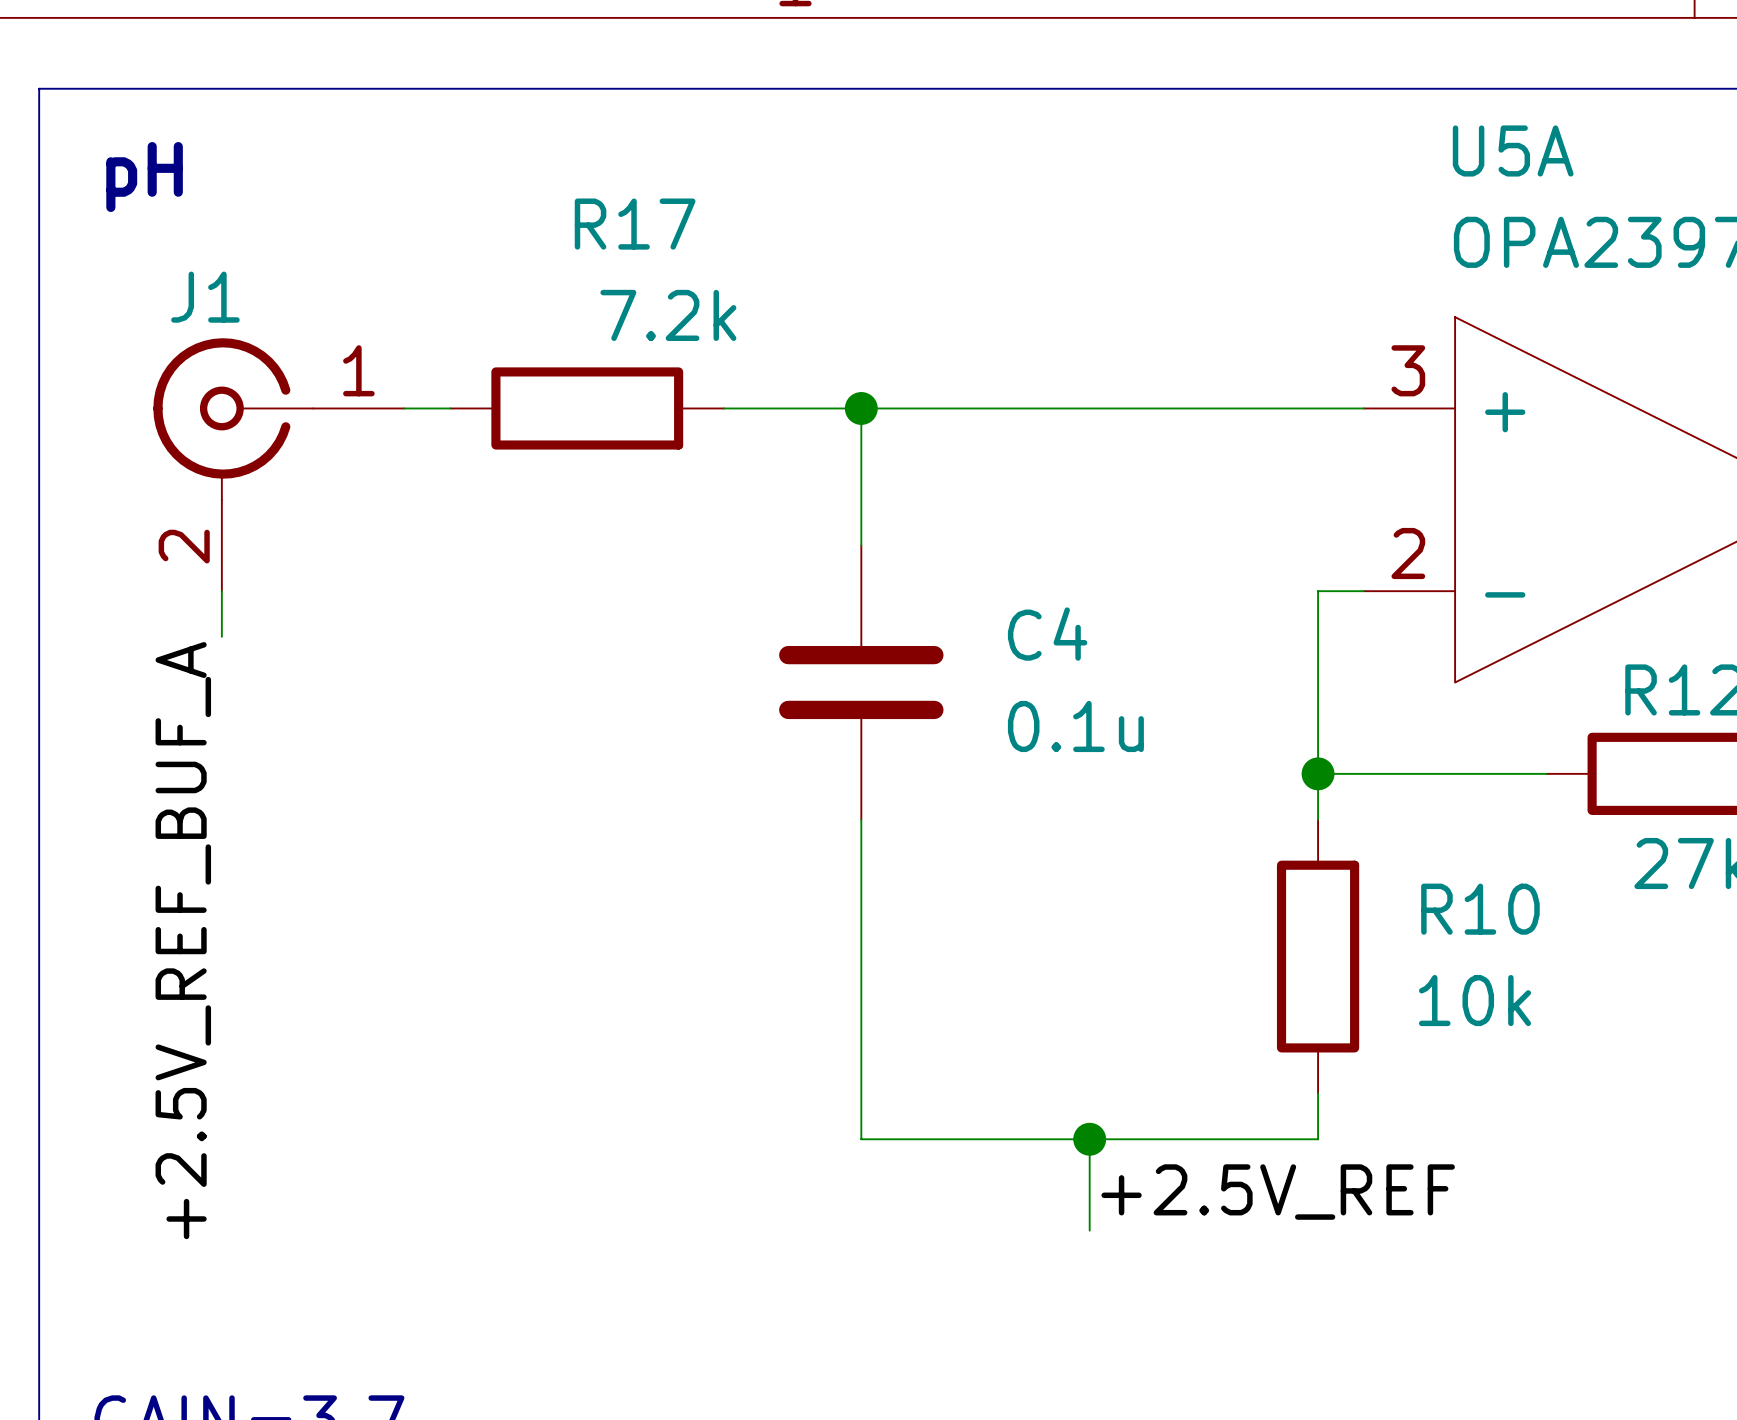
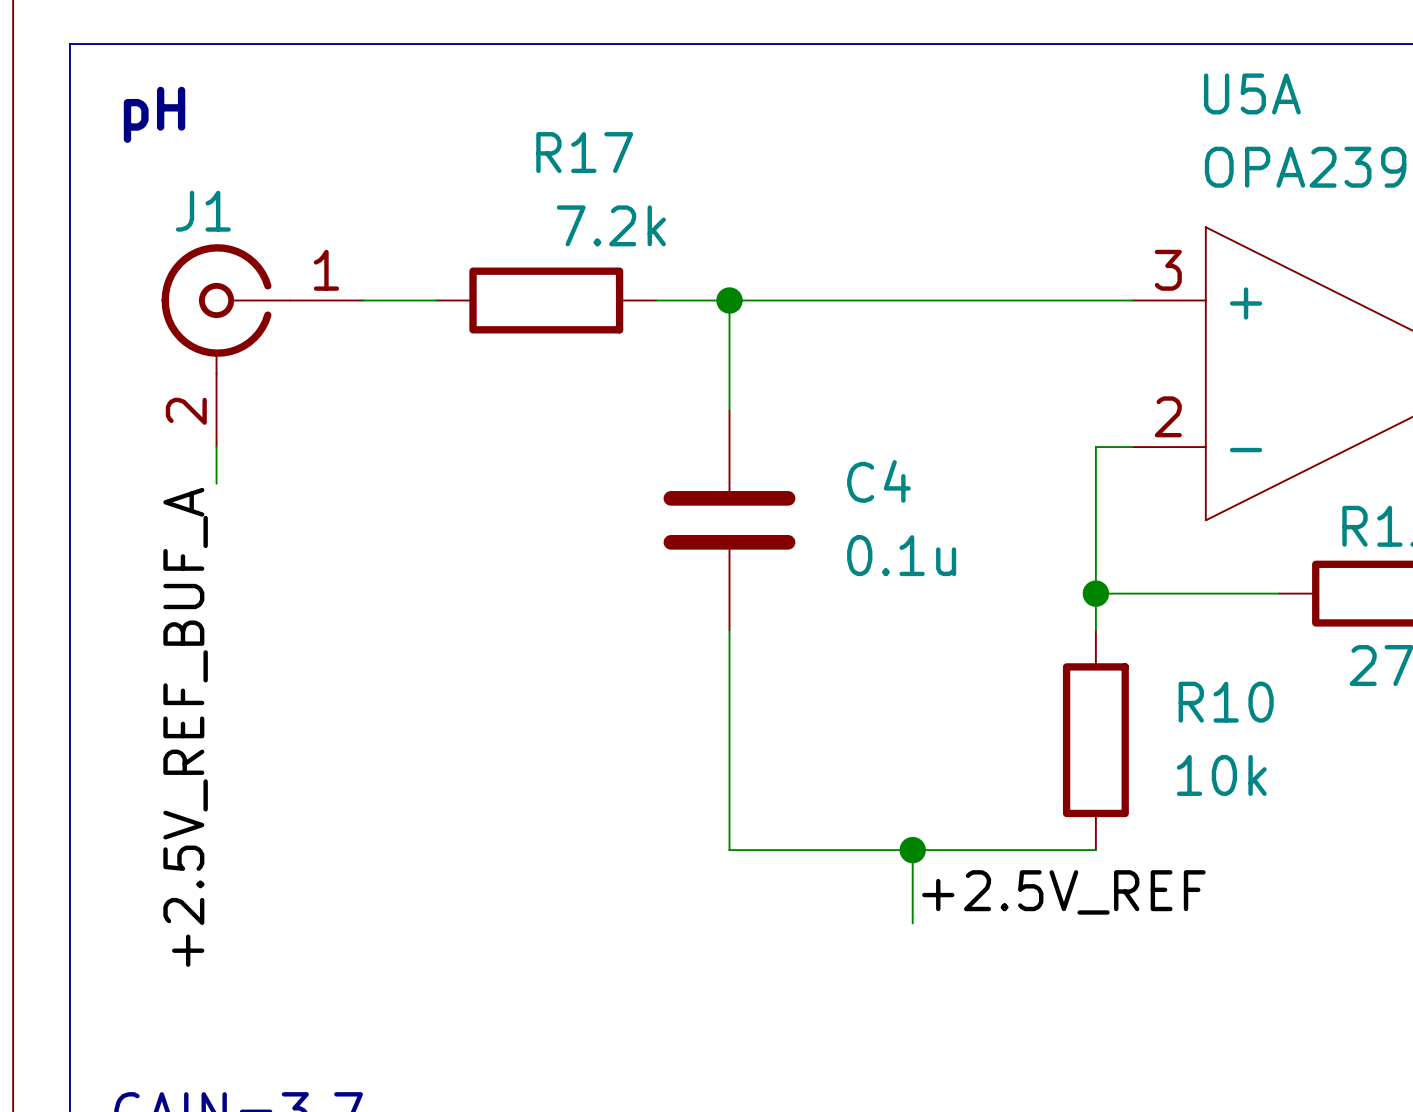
R17 position: (587, 408) -> (546, 300)
wire: (861, 1093) (861, 1139) (1318, 1139) (1318, 1093) -> (729, 850) (1095, 850)
junction position: (1089, 1139) -> (912, 850)
wire: (1089, 1184) (1089, 1230) -> (912, 850) (912, 886)
label position: +2.5V_REF (1278, 1192) -> +2.5V_REF (1063, 892)

